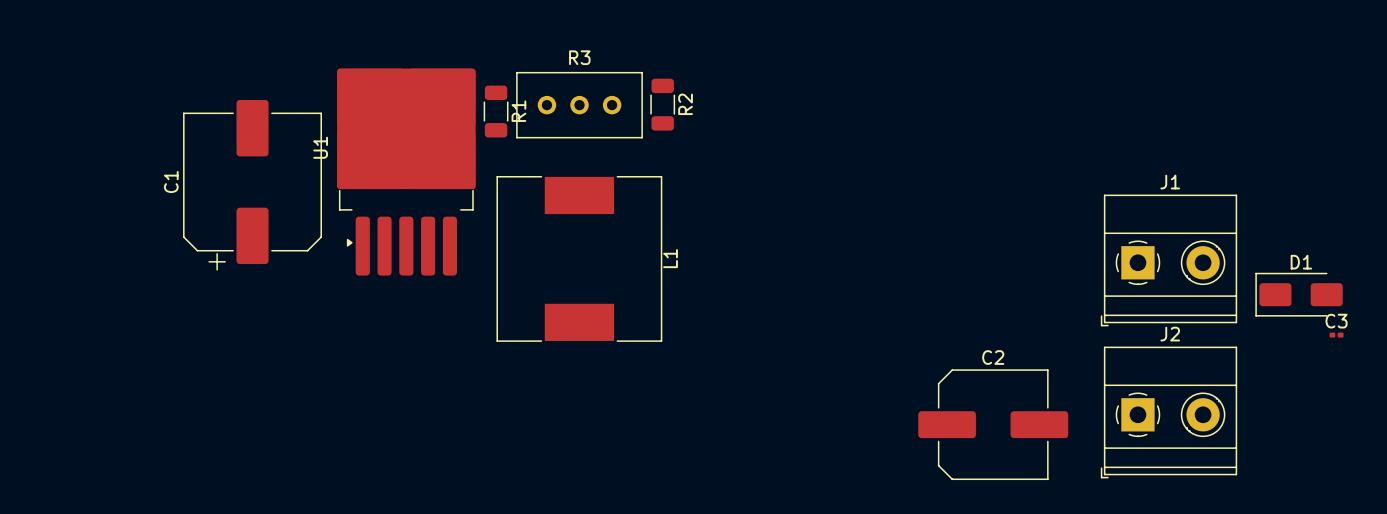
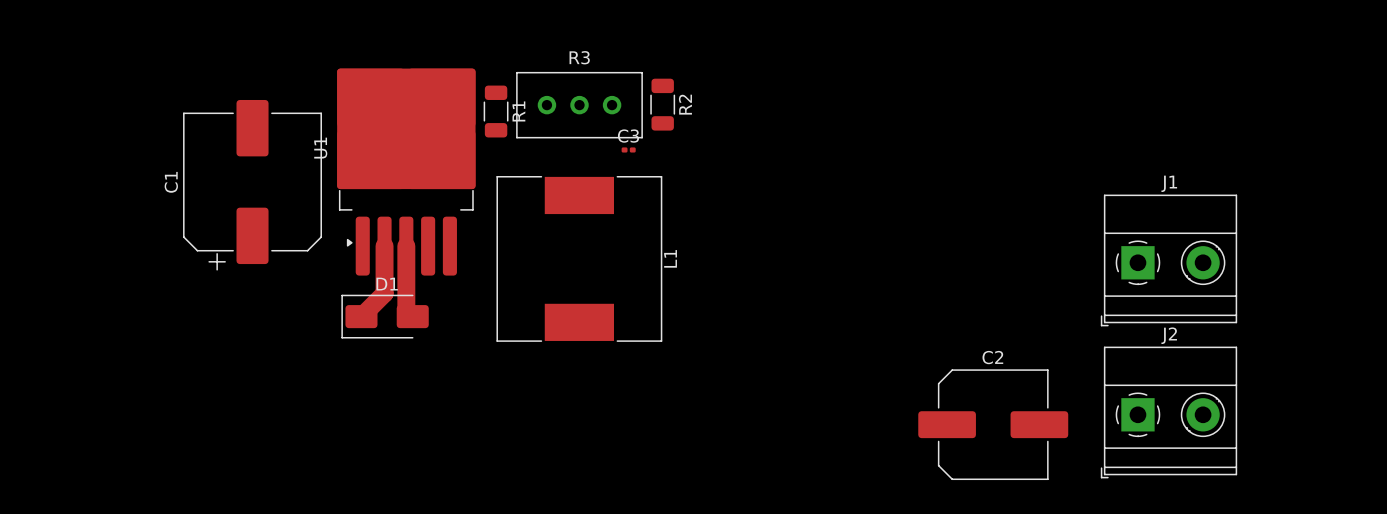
track: none -> (384, 246) (384, 293) (361, 316)
track: none -> (406, 246) (406, 310) (412, 316)
D1 position: (1299, 294) -> (385, 316)
C3 position: (1336, 335) -> (628, 149)

